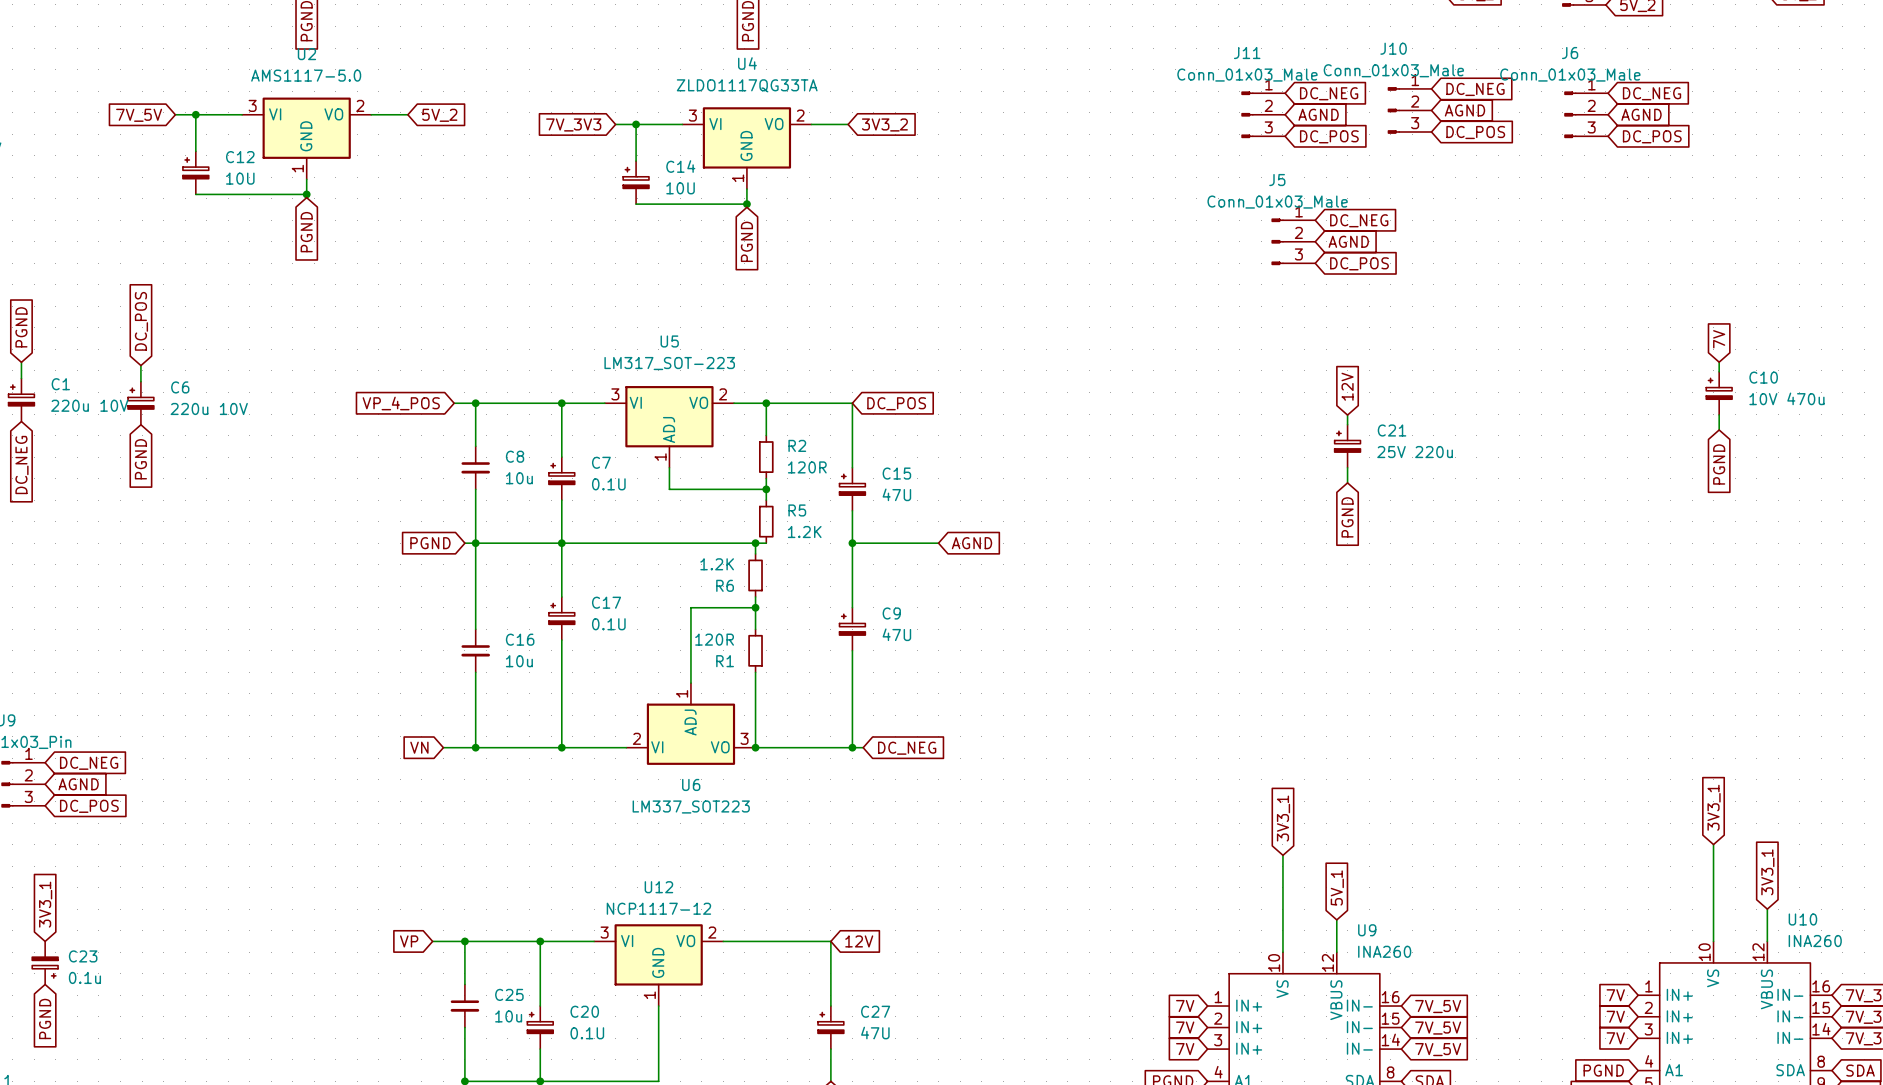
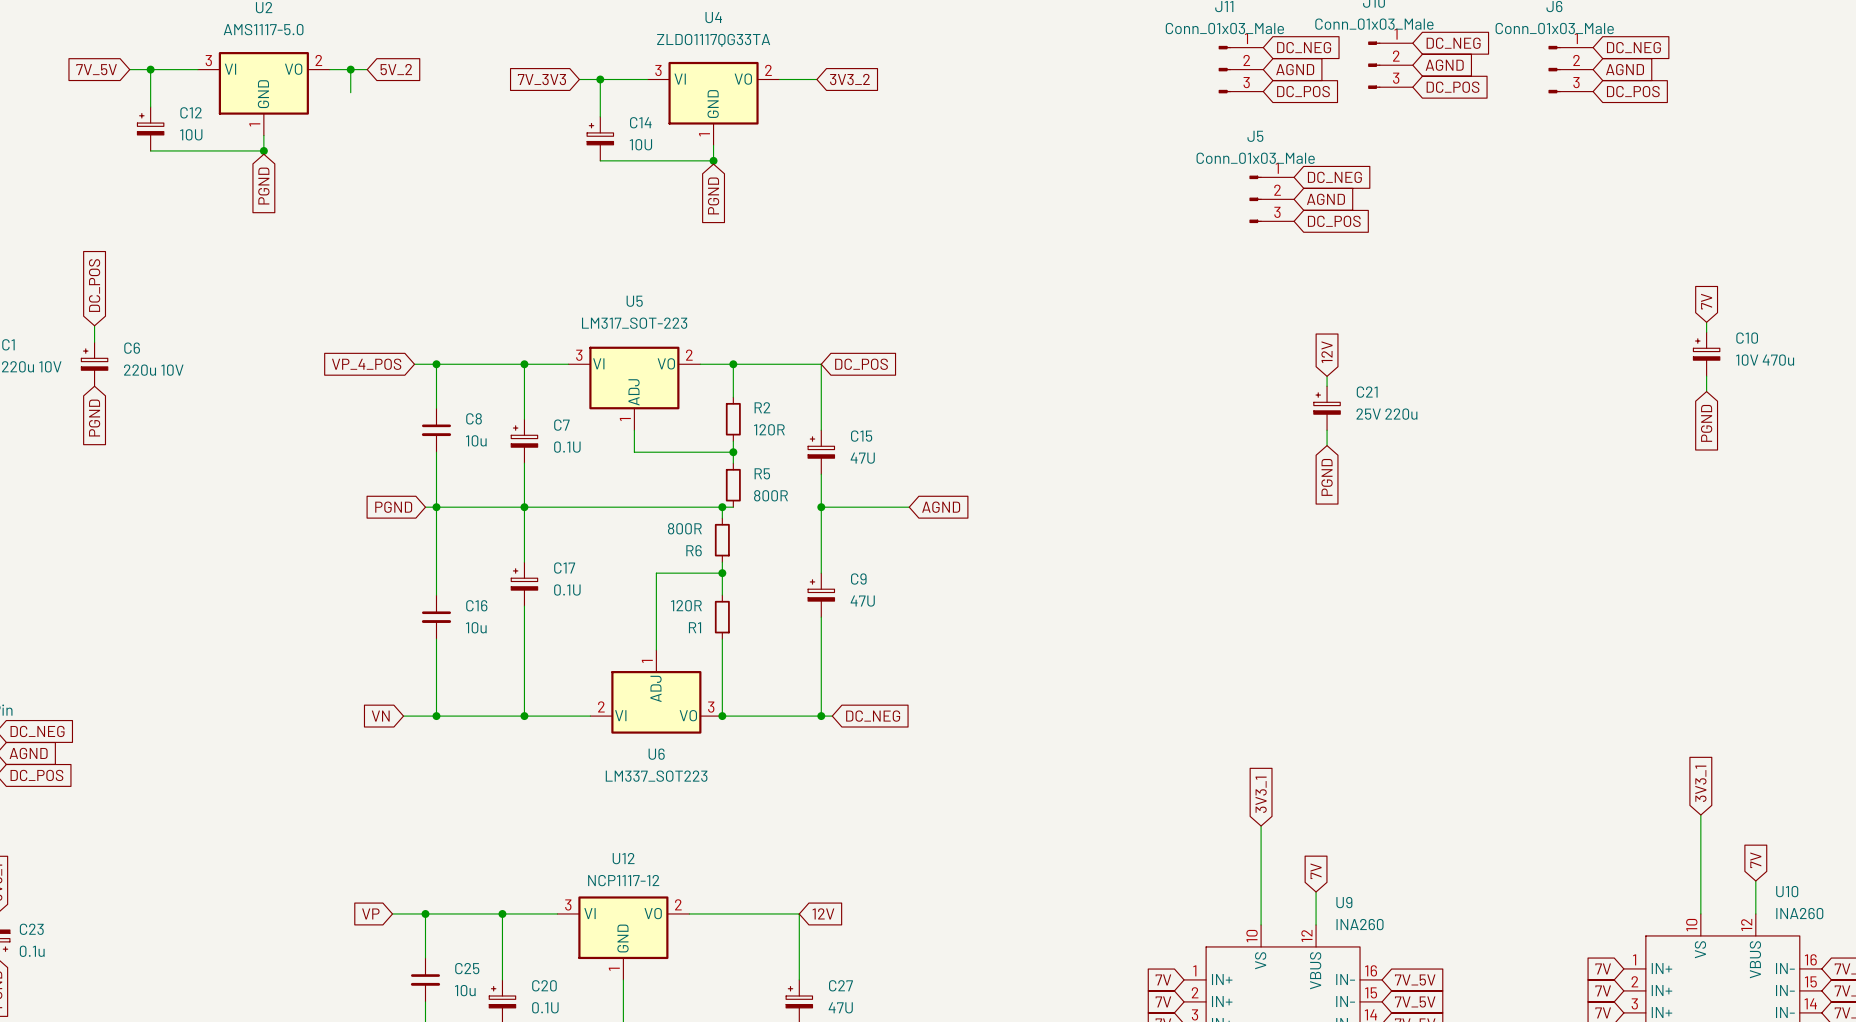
wire: none -> (350, 69) (350, 92)
junction: none -> (350, 69)
R5 value: 1.2K (804, 532) -> 800R (770, 495)
R6 value: 1.2K (717, 564) -> 800R (684, 528)
global label: 3V3_1 (1767, 872) -> 7V (1755, 860)
global label: 5V_1 (1337, 887) -> 7V (1316, 871)

